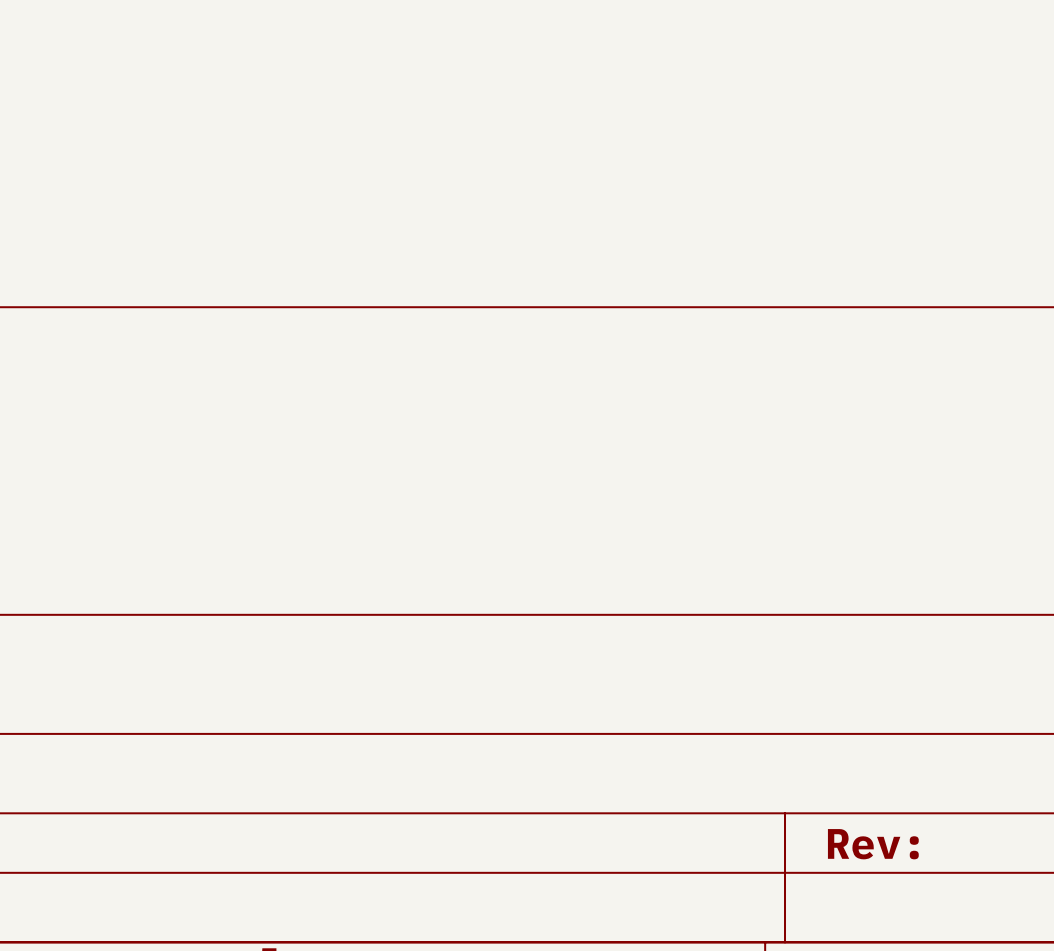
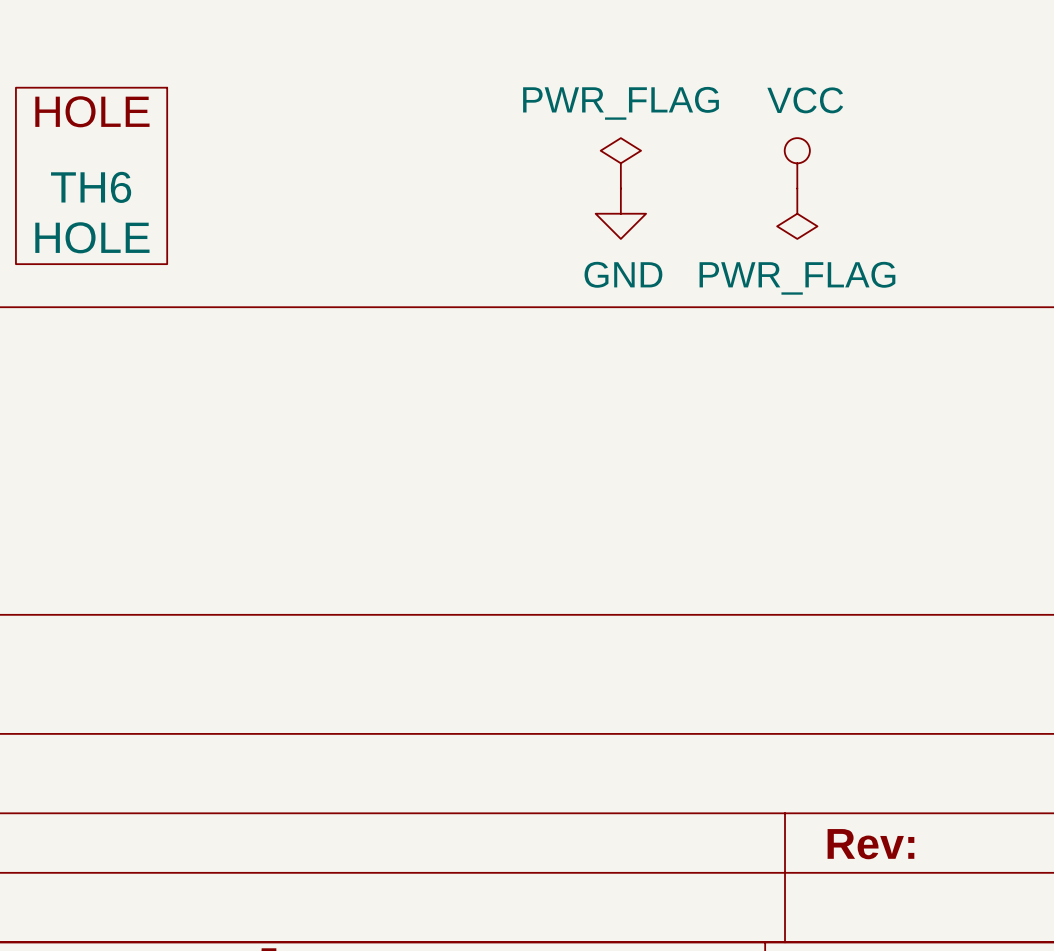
power symbol: none -> PWR_FLAG (620, 163)
power symbol: none -> VCC (797, 163)
TH6: none -> HOLE (91, 175)
power symbol: none -> GND (620, 213)
power symbol: none -> PWR_FLAG (797, 213)

